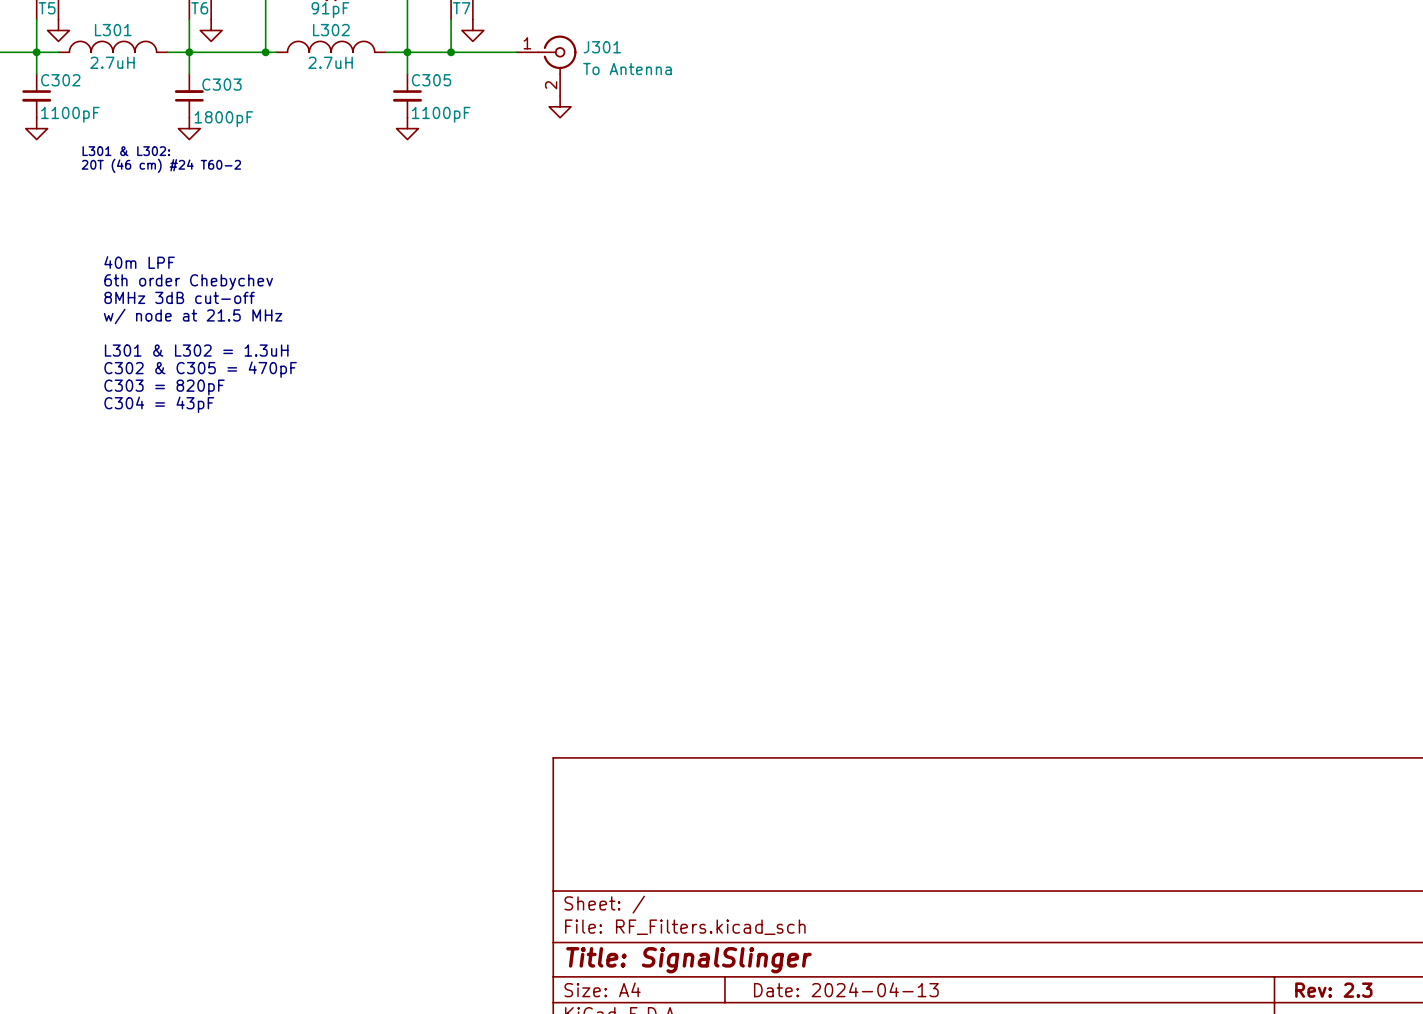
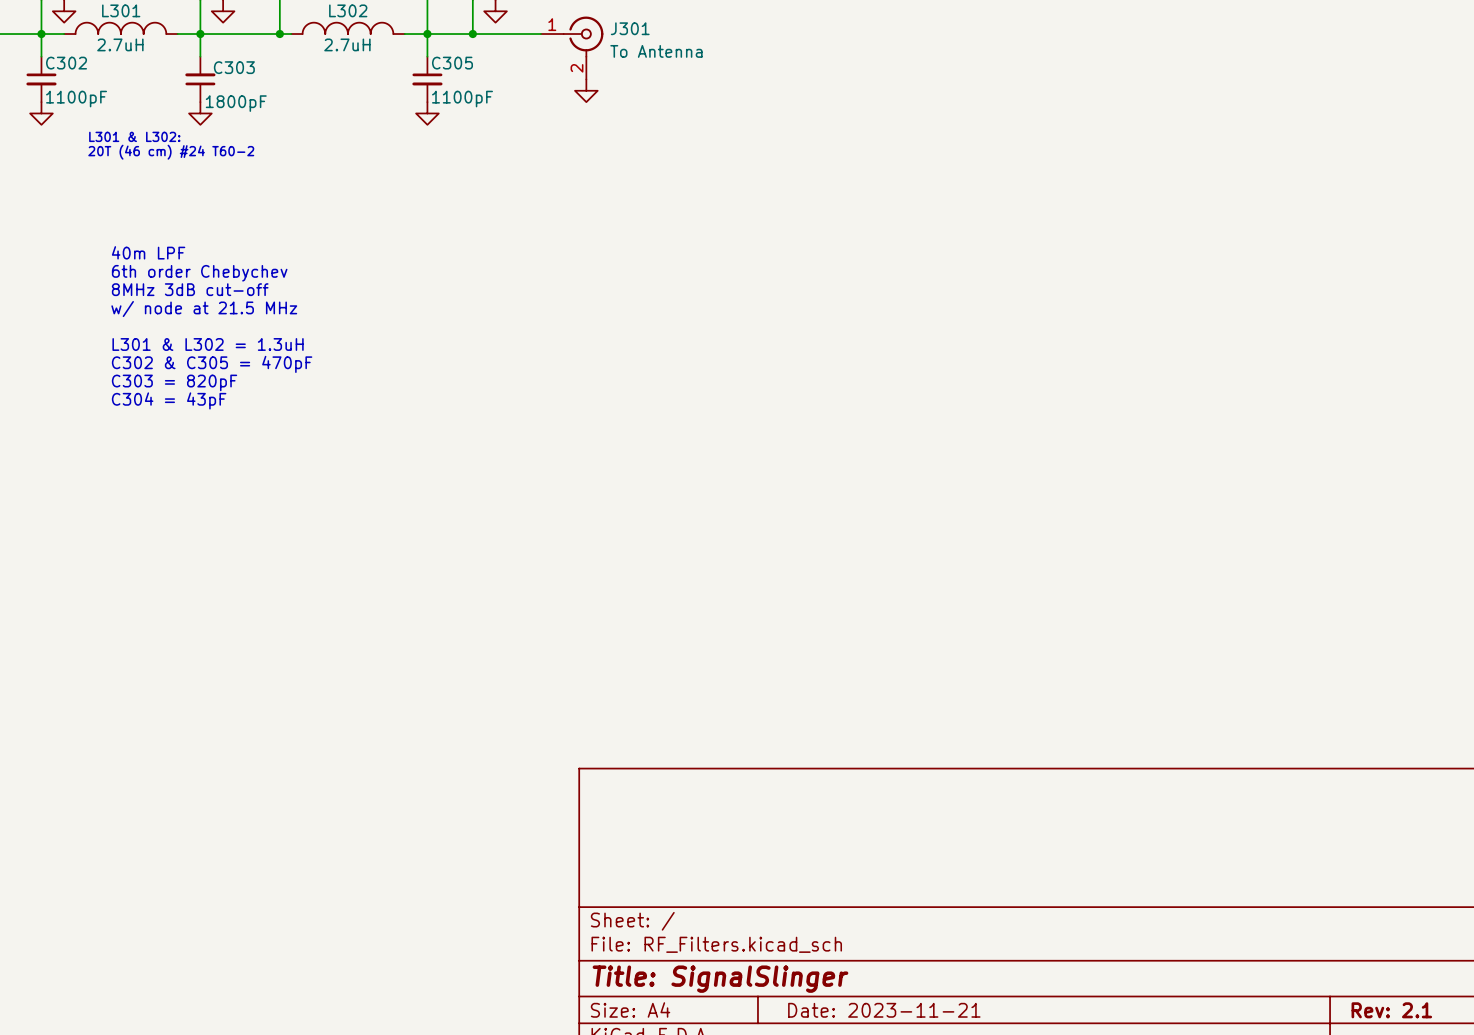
title block: Date: 2024-04-13 (846, 989) -> Date: 2023-11-21 (884, 1010)
title block: Rev: 2.3 (1333, 990) -> Rev: 2.1 (1391, 1010)

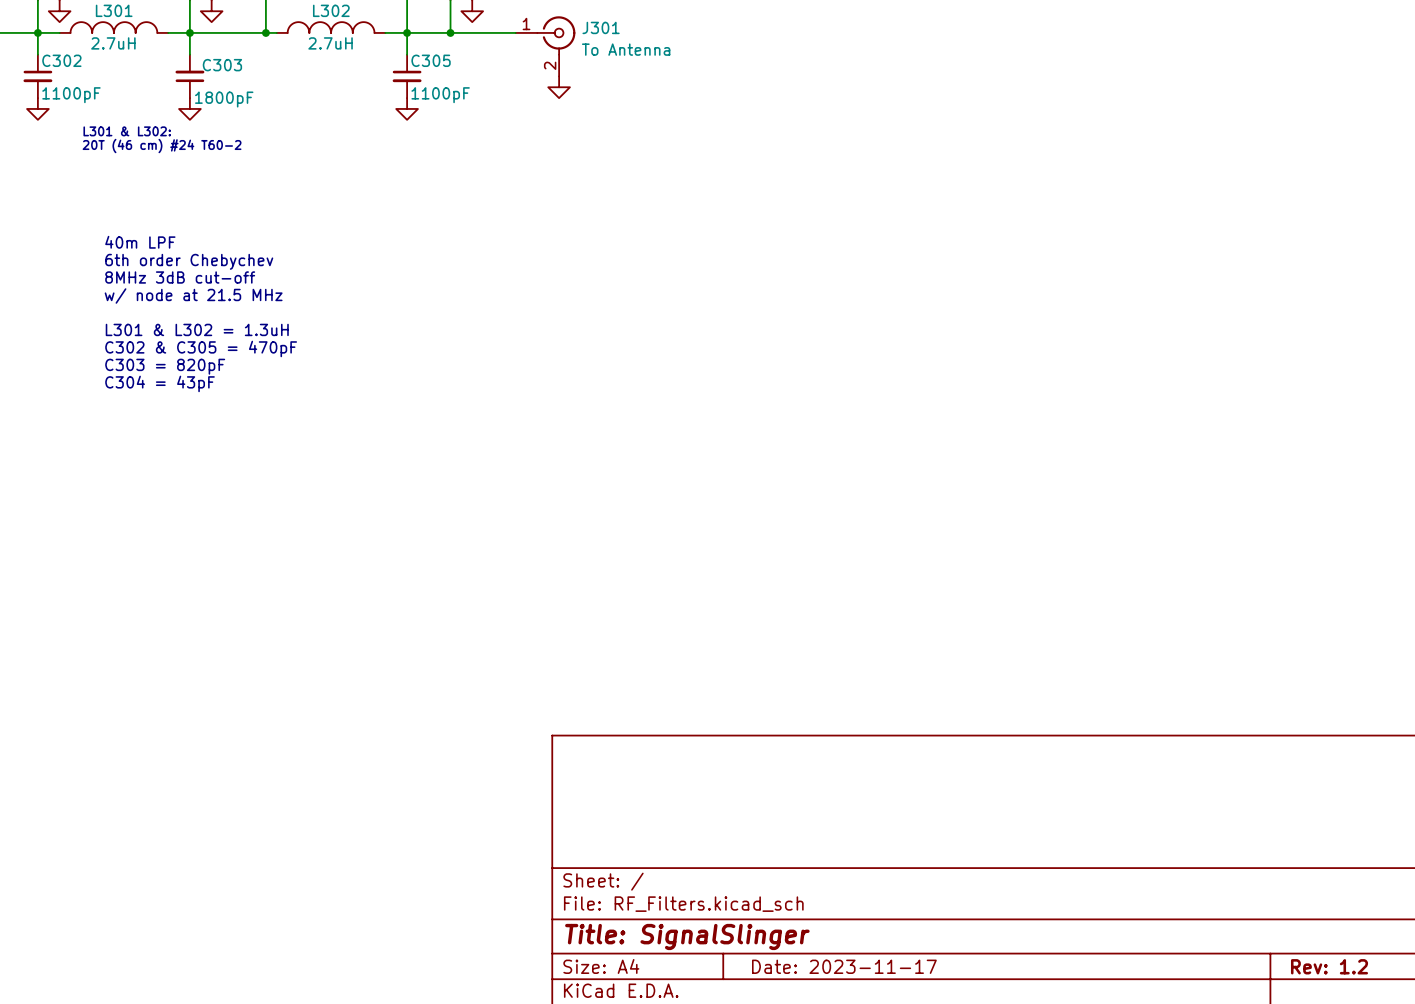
title block: Date: 2023-11-21 (884, 1010) -> Date: 2023-11-17 (844, 966)
title block: Rev: 2.1 (1391, 1010) -> Rev: 1.2 (1329, 966)

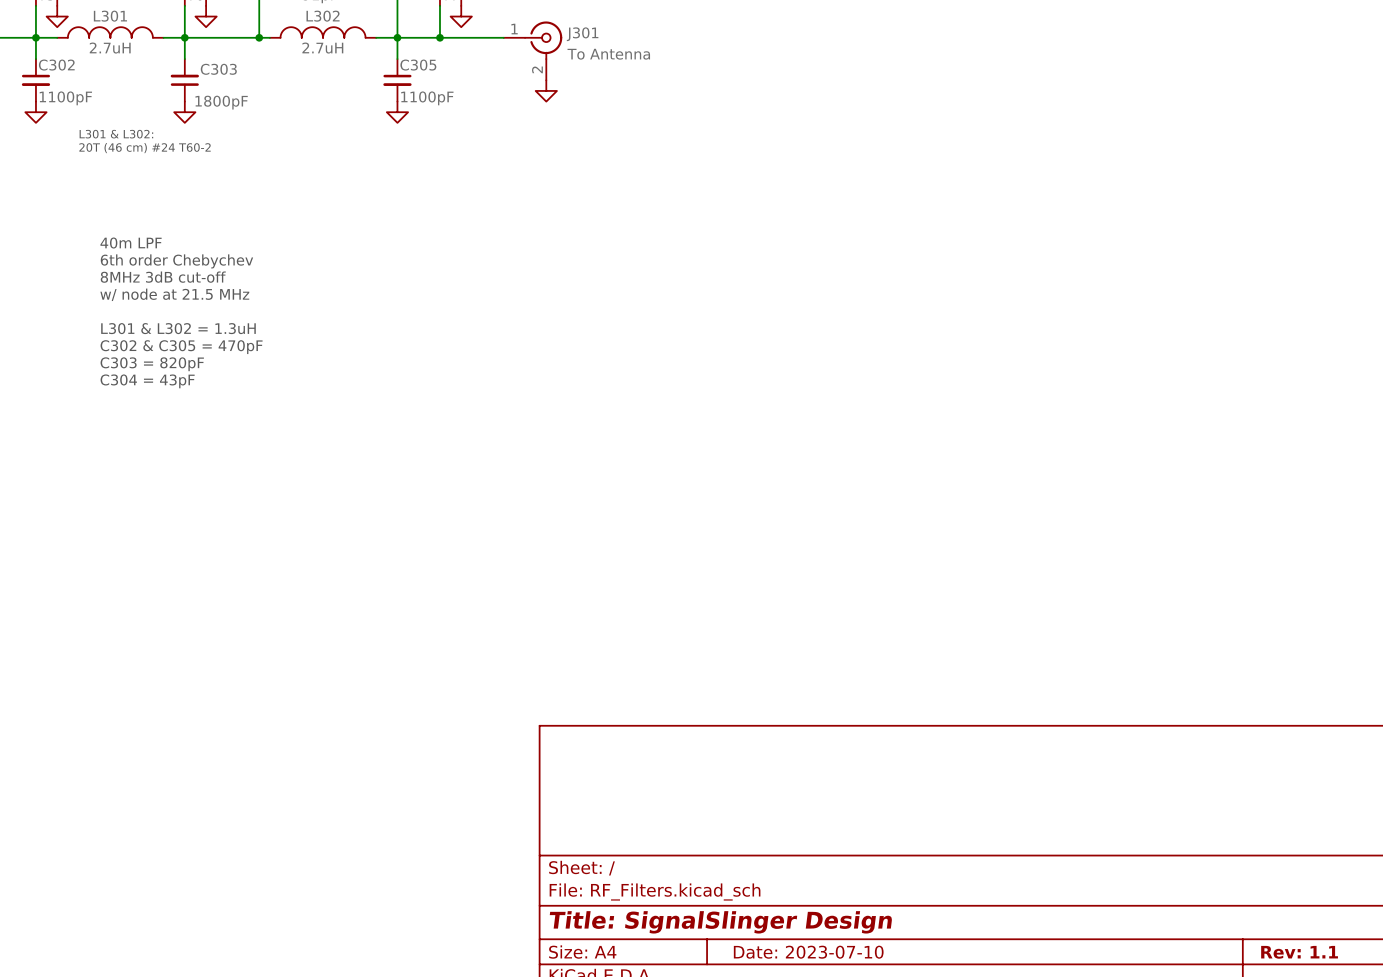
title block: Title: SignalSlinger (687, 936) -> Title: SignalSlinger Design (720, 922)
title block: Date: 2023-11-17 (844, 966) -> Date: 2023-07-10 (808, 952)
title block: Rev: 1.2 (1329, 966) -> Rev: 1.1 (1299, 952)

